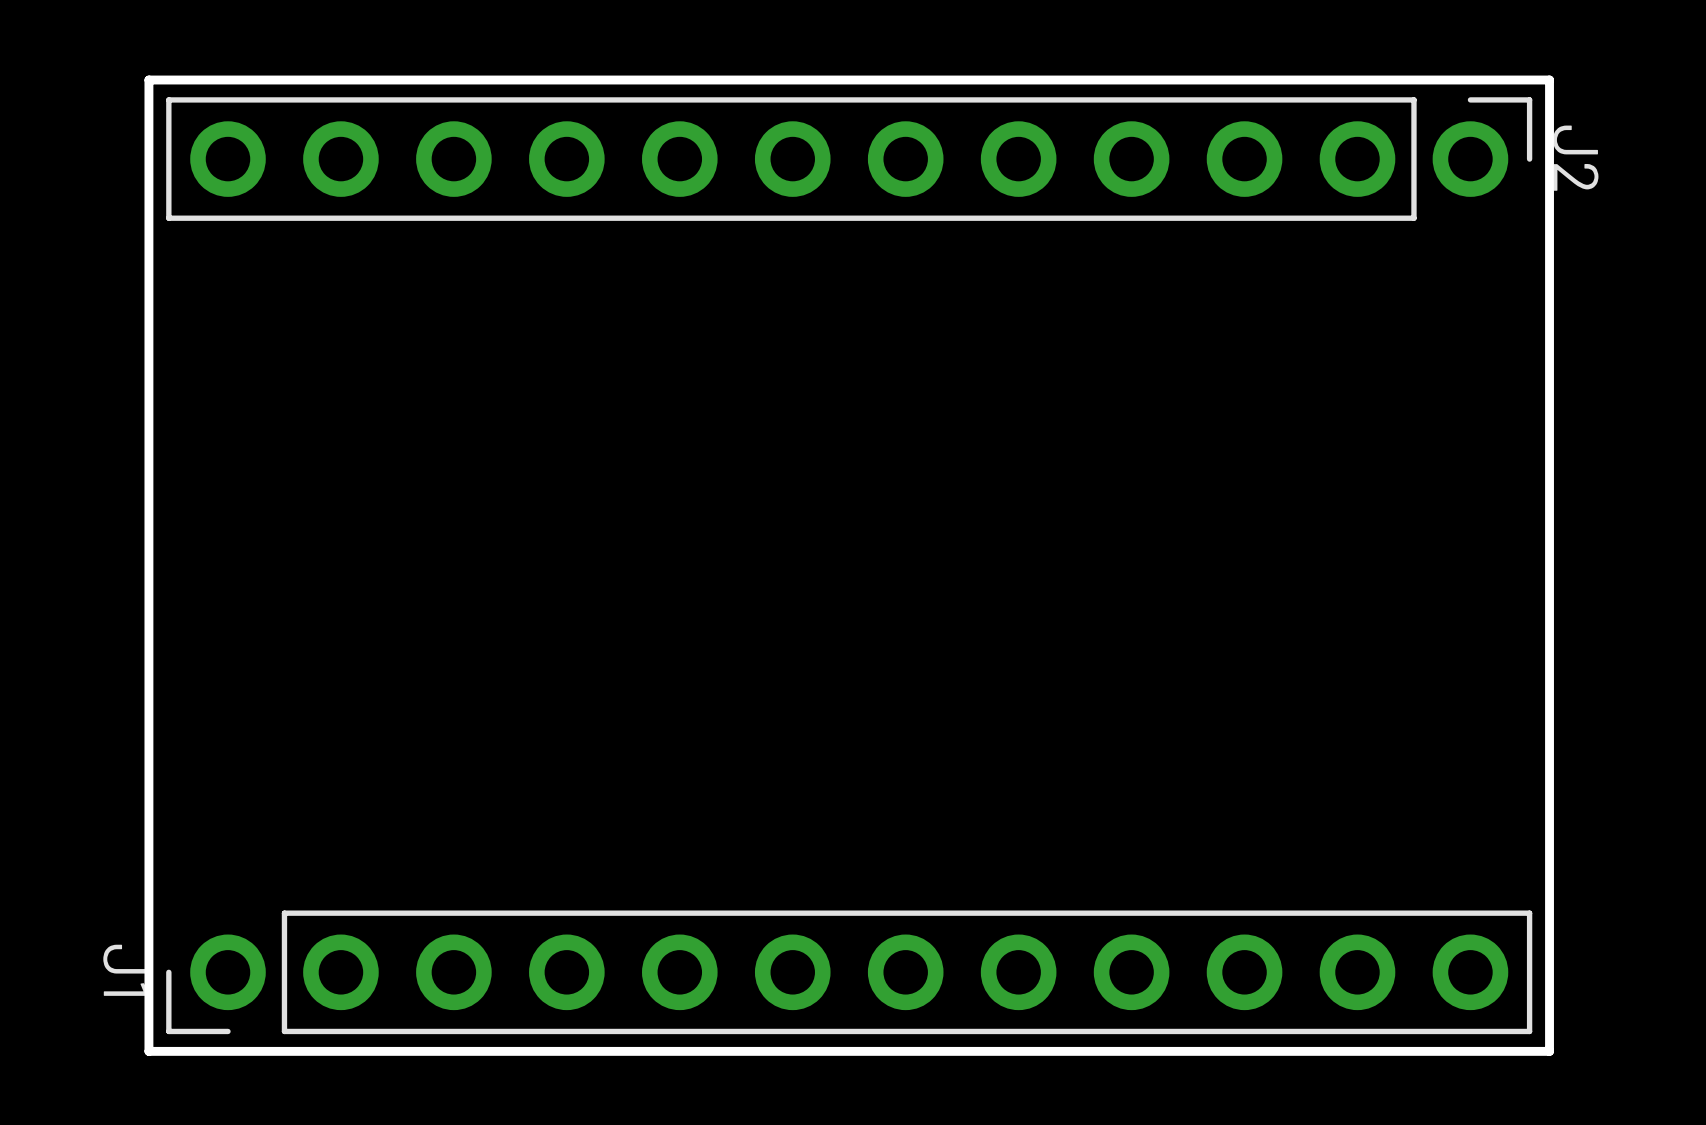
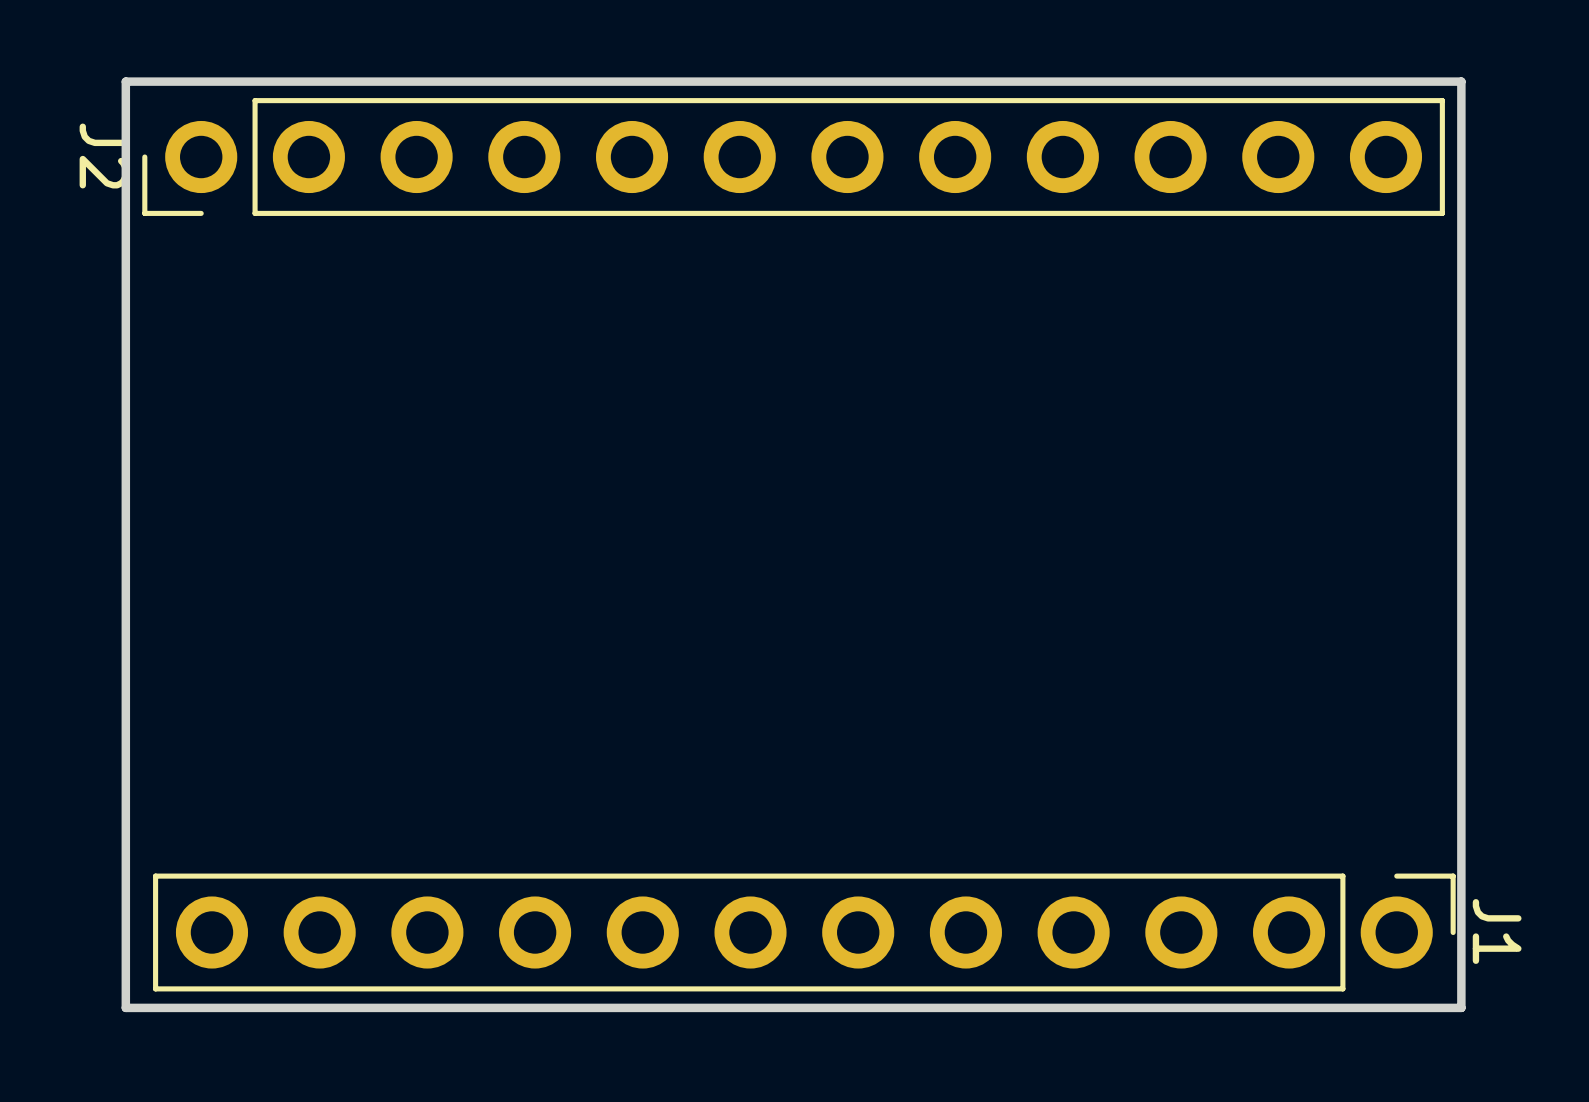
J2 rotation: 0° (849, 159) -> 180° (793, 157)
J1 rotation: 0° (849, 972) -> 180° (804, 932)

